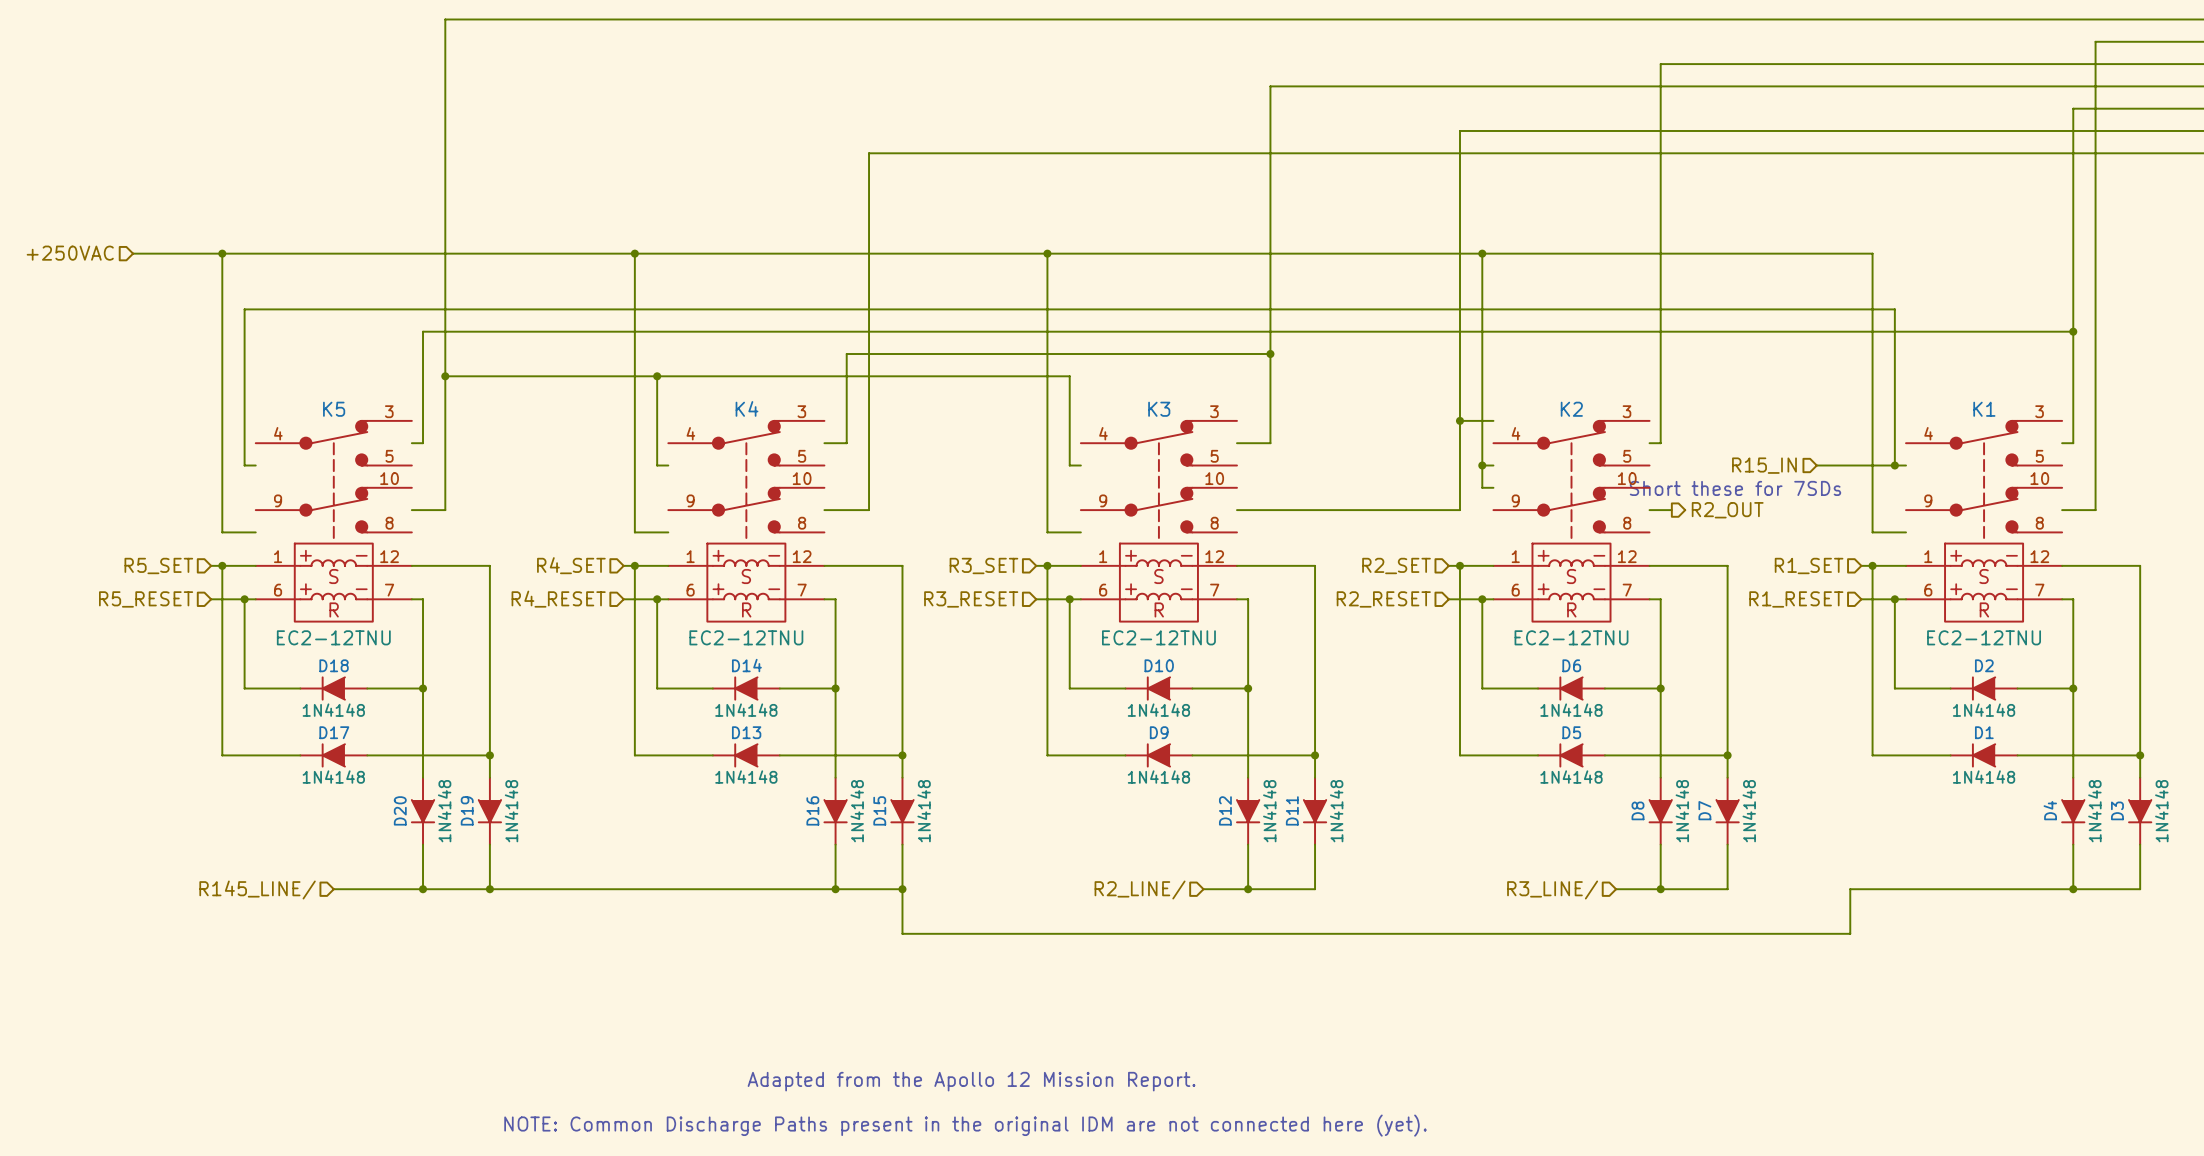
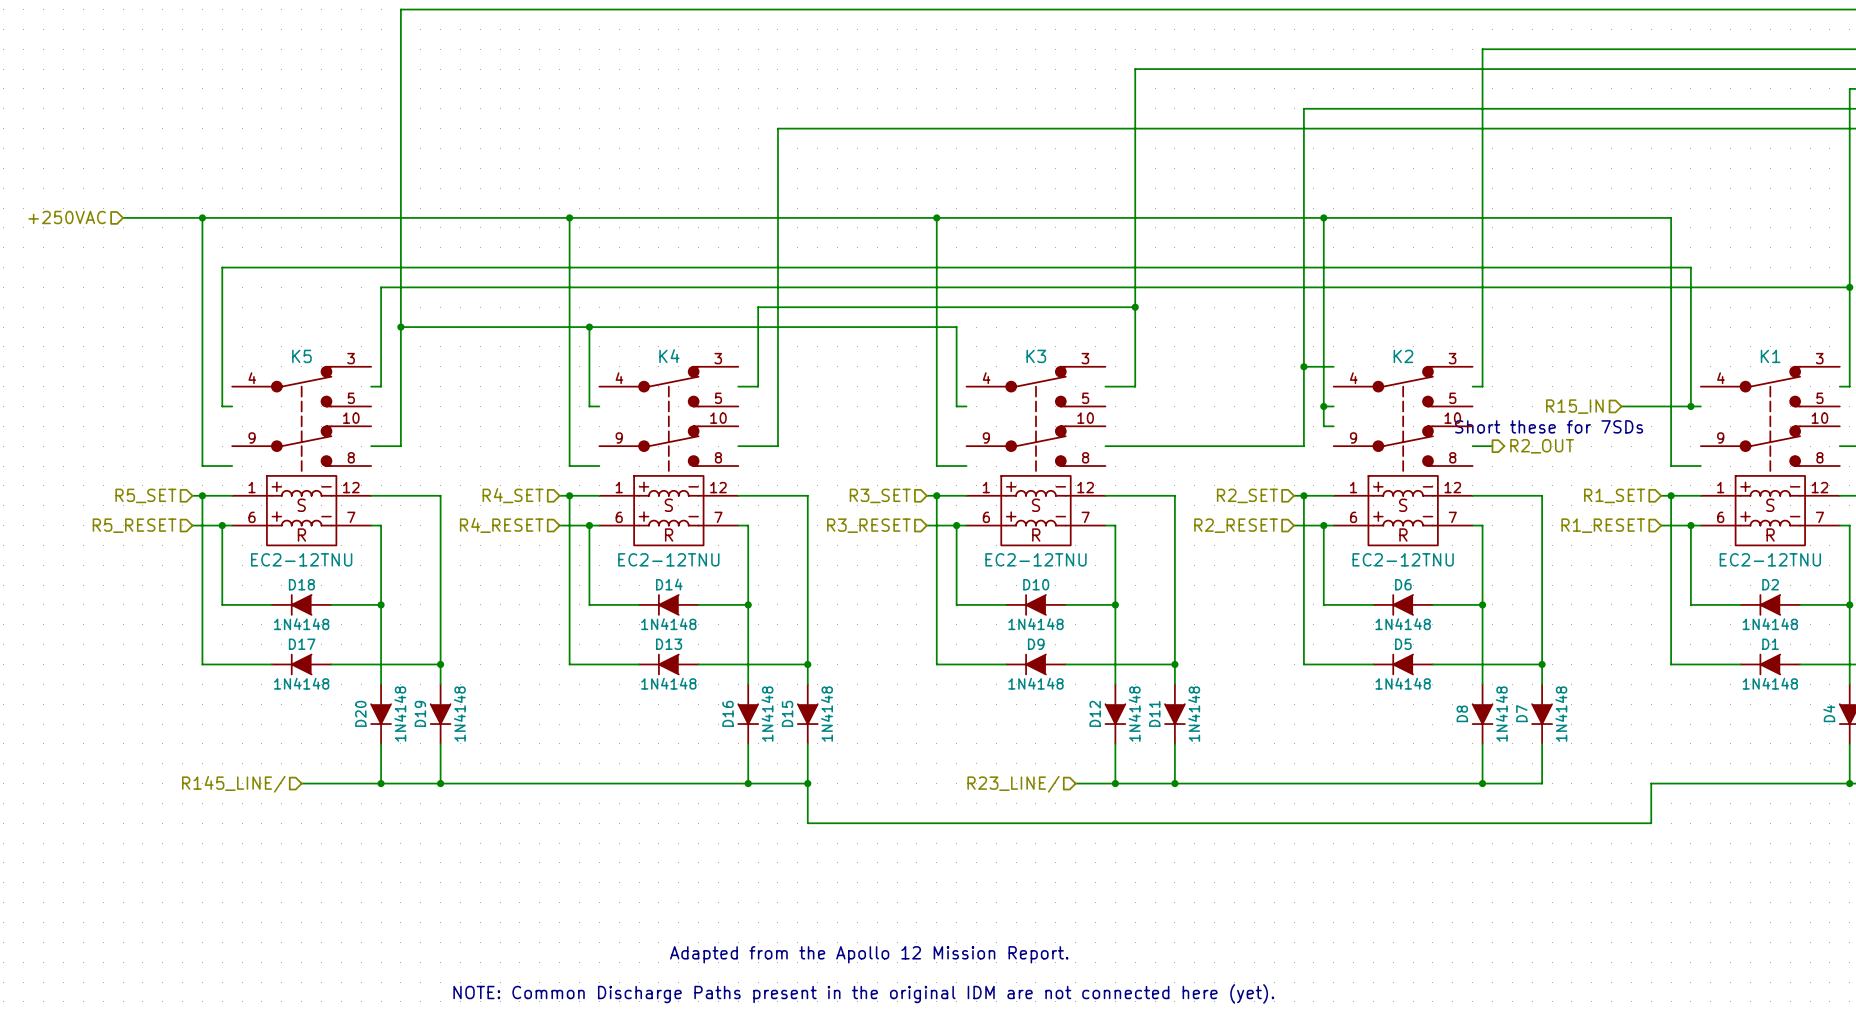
hierarchical label: R2_LINE/ (1140, 889) -> R23_LINE/ (1013, 784)
wire: none -> (1174, 783) (1442, 783)
junction: none -> (1174, 783)
hierarchical label: R3_LINE/ (1552, 889) -> none

